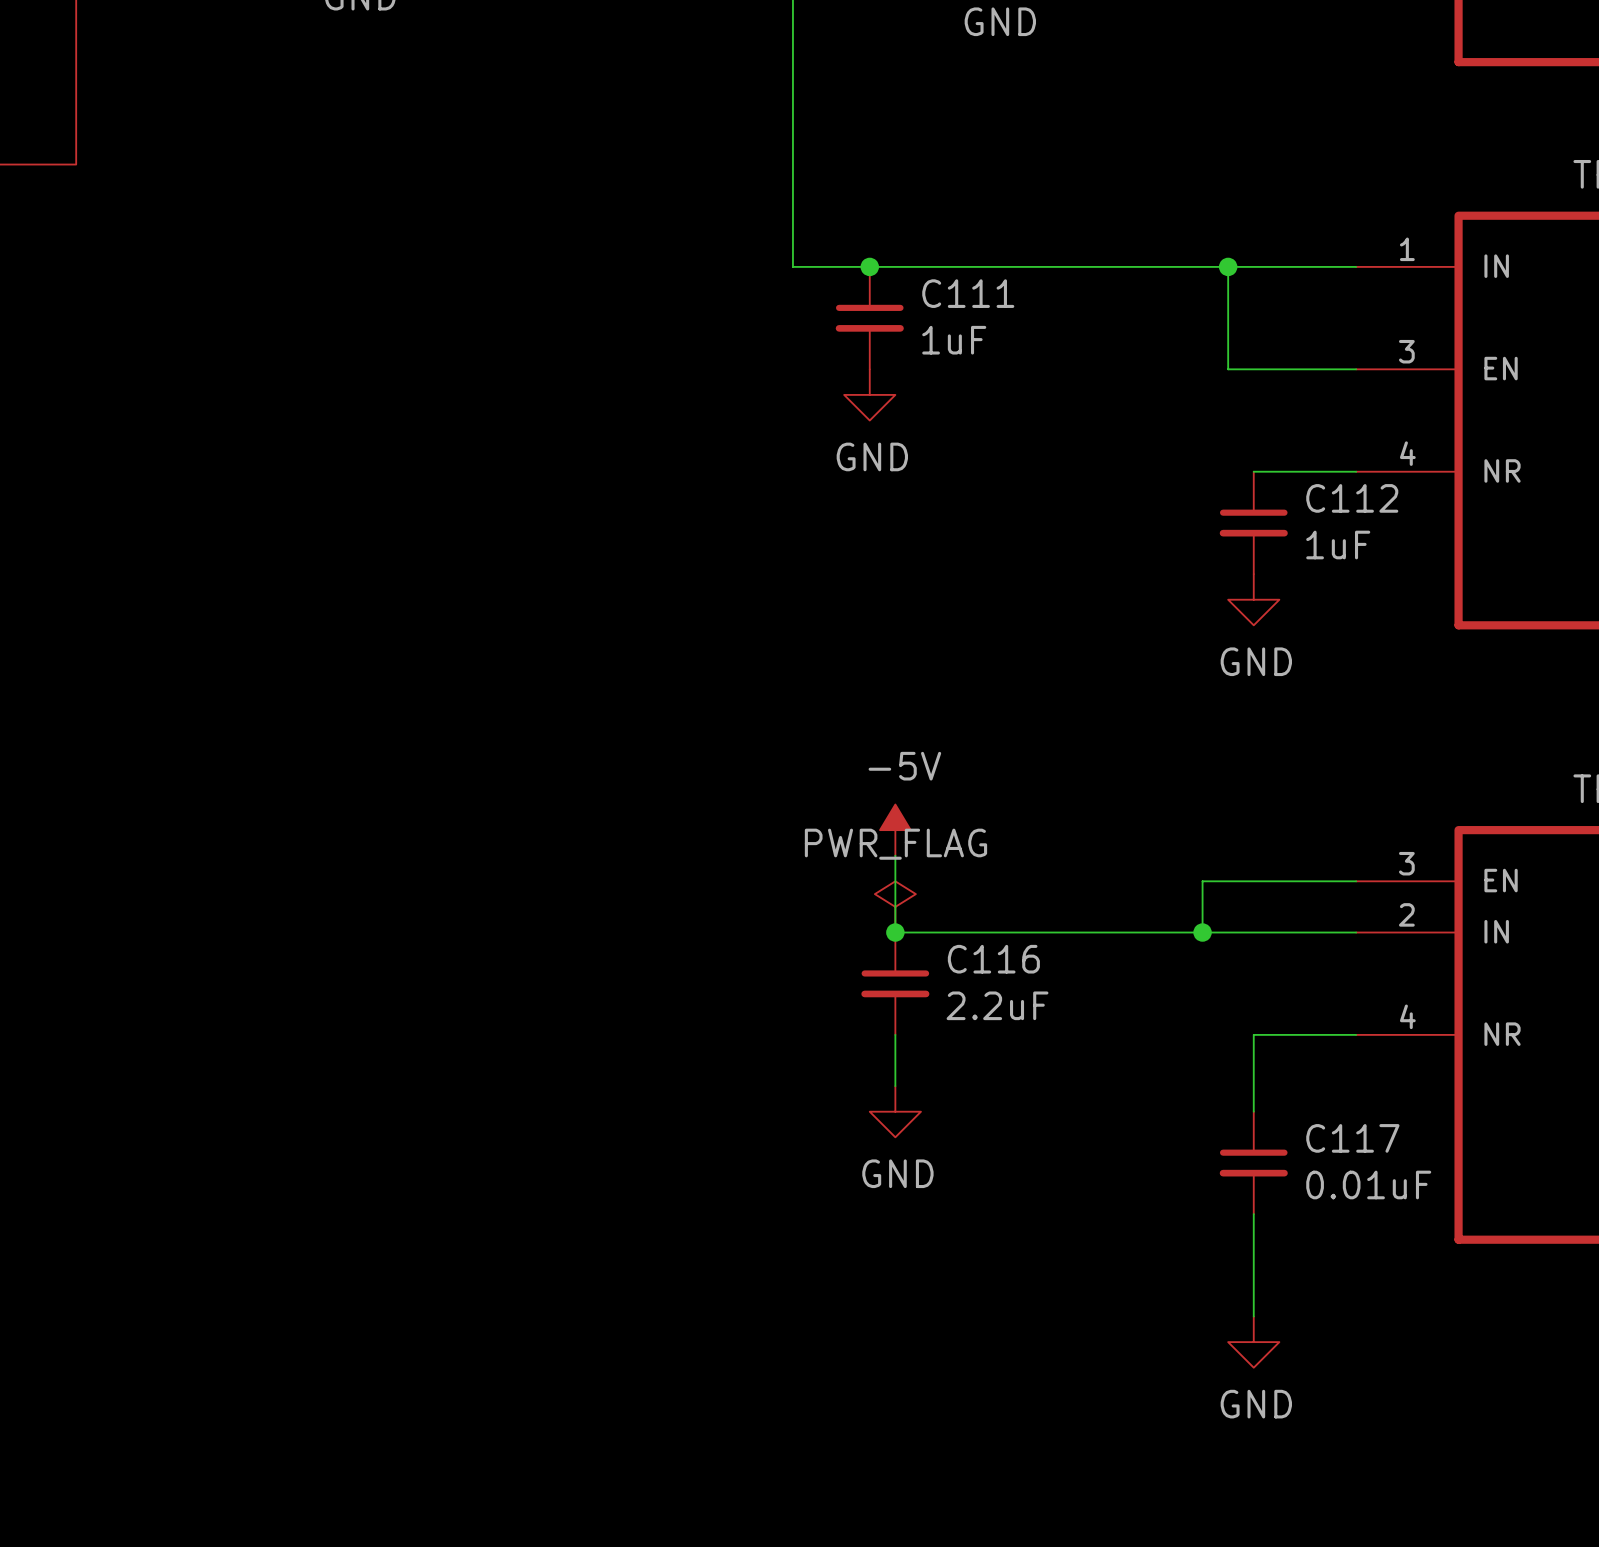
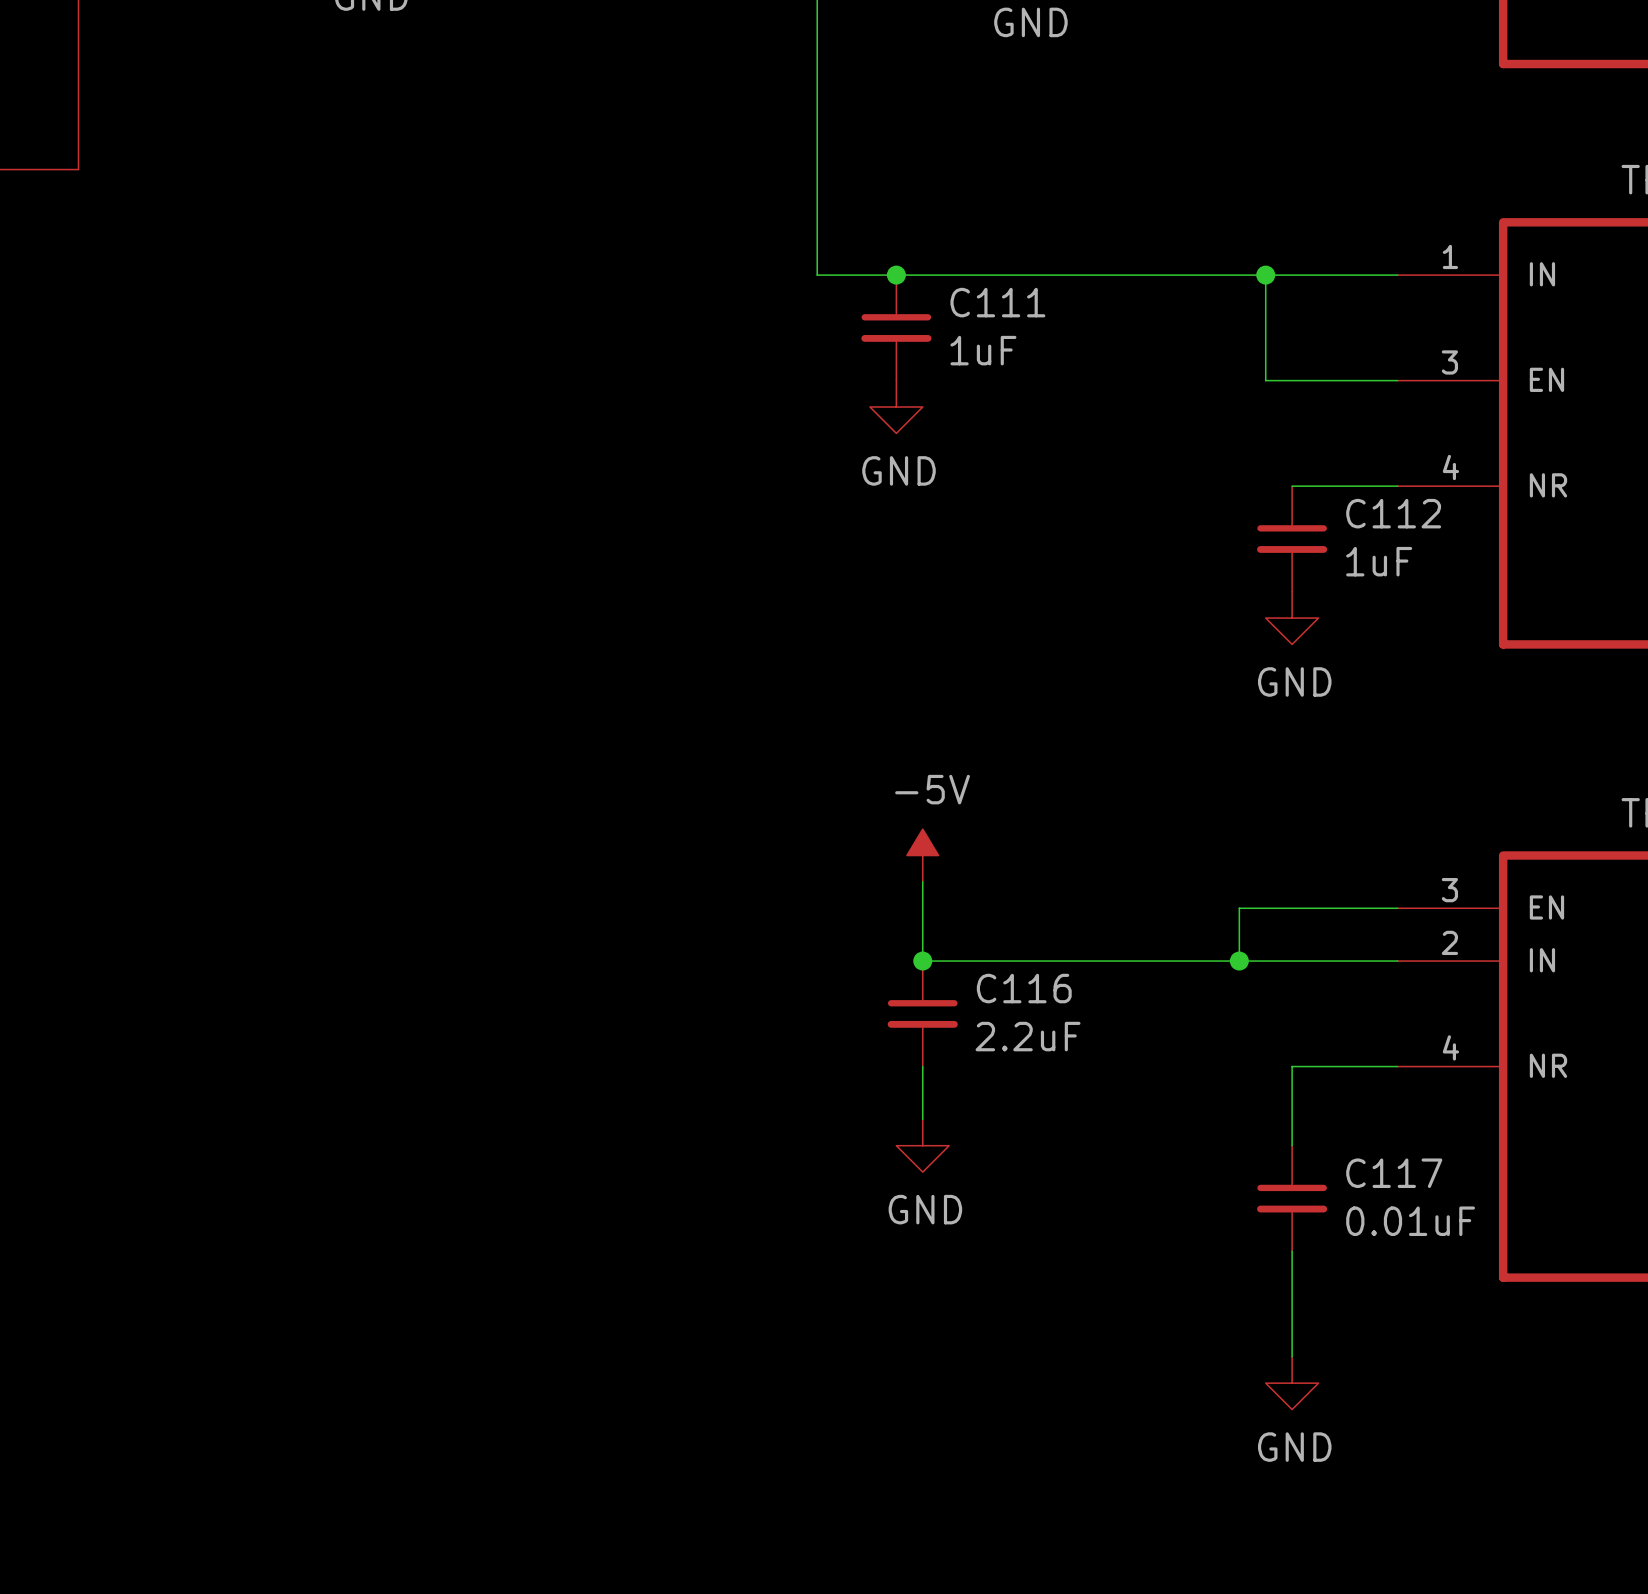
power symbol: PWR_FLAG (895, 906) -> none

